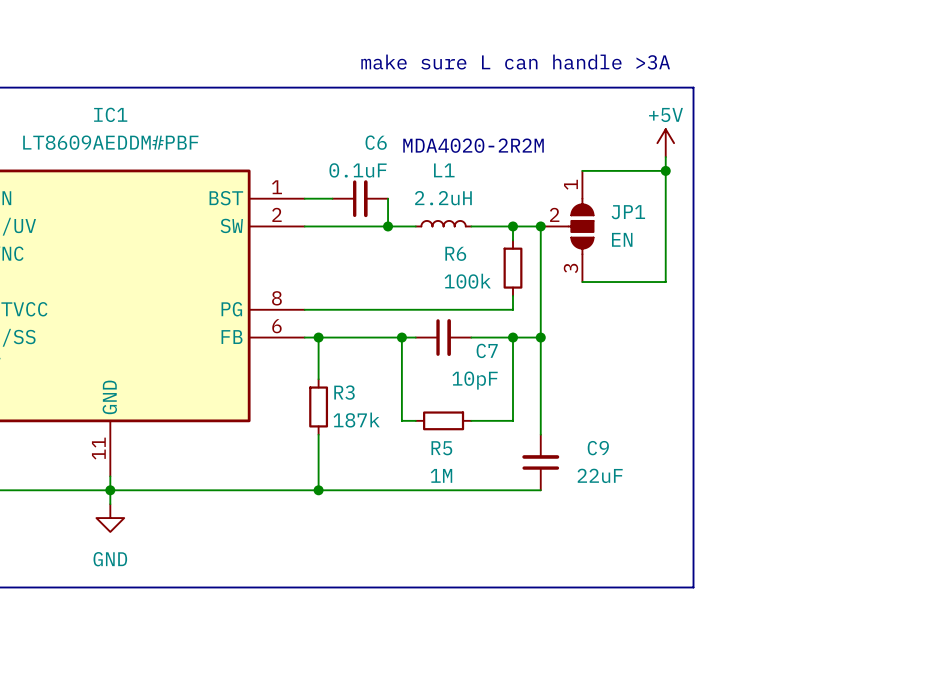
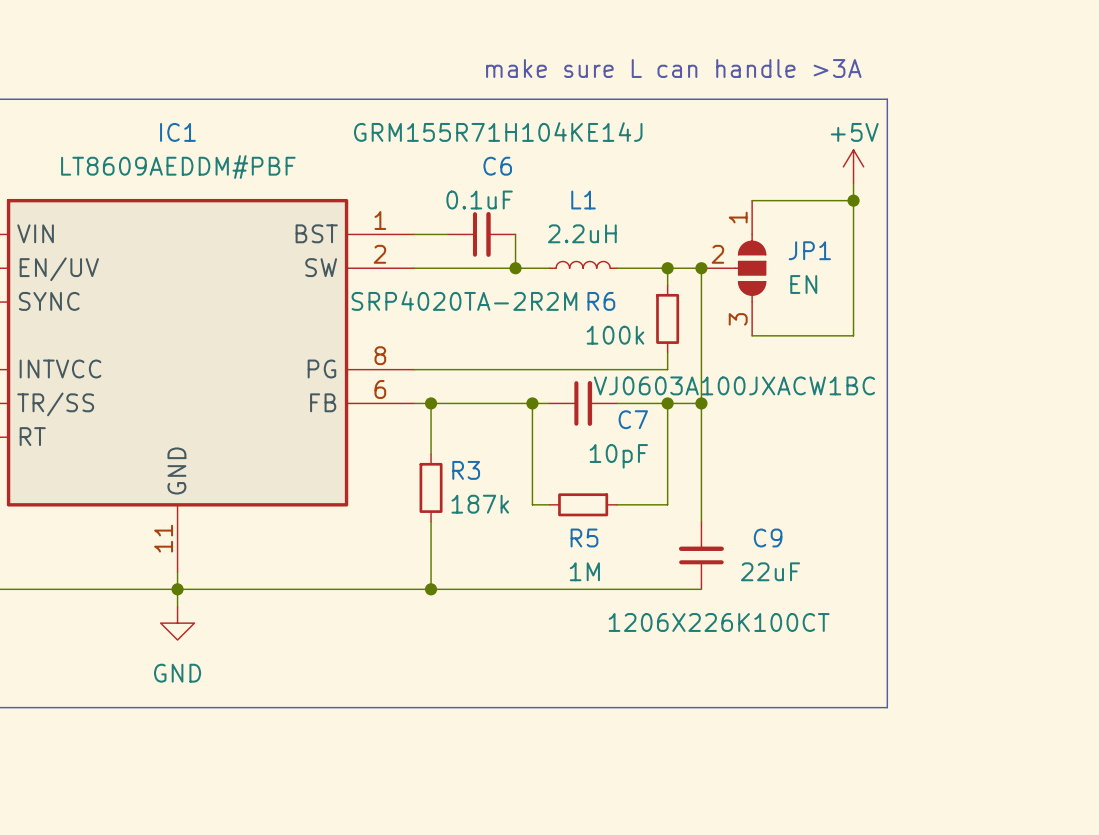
C6 text: none -> GRM155R71H104KE14J (498, 132)
text: MDA4020-2R2M (473, 145) -> none
L1 text: none -> SRP4020TA-2R2M (464, 301)
C7 text: none -> VJ0603A100JXACW1BC (734, 385)
C9 text: none -> 1206X226K100CT (719, 622)

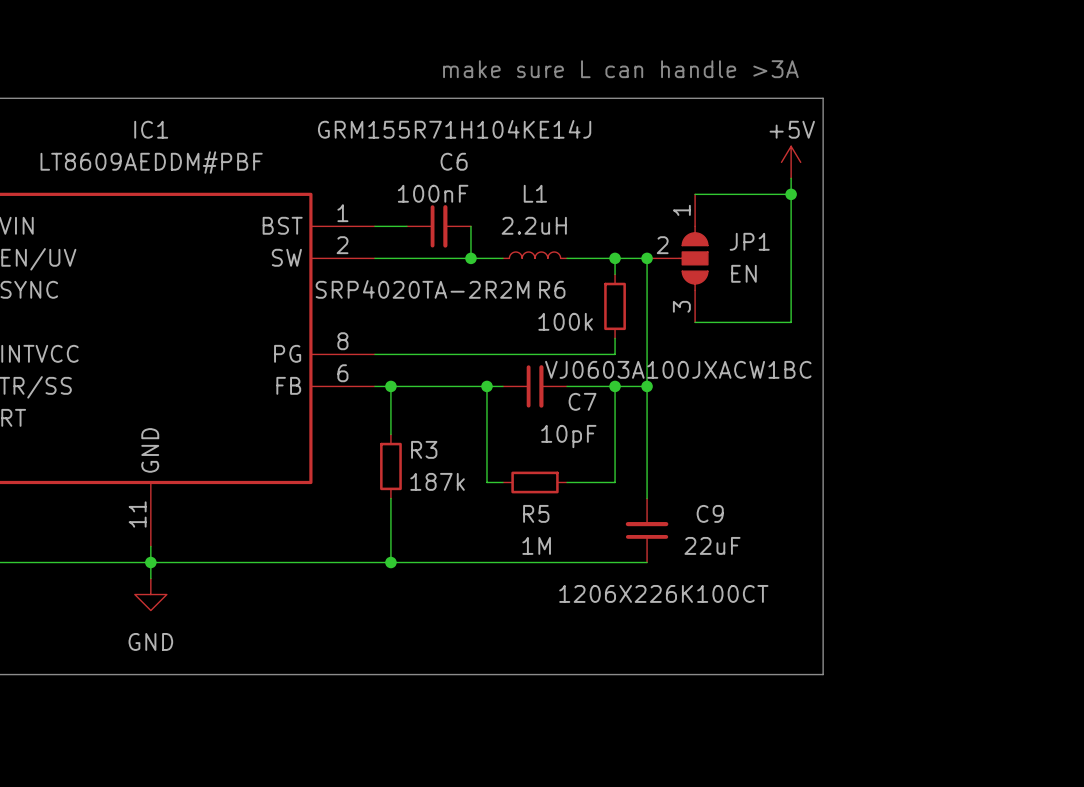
C6 value: 0.1uF (479, 200) -> 100nF (433, 193)

